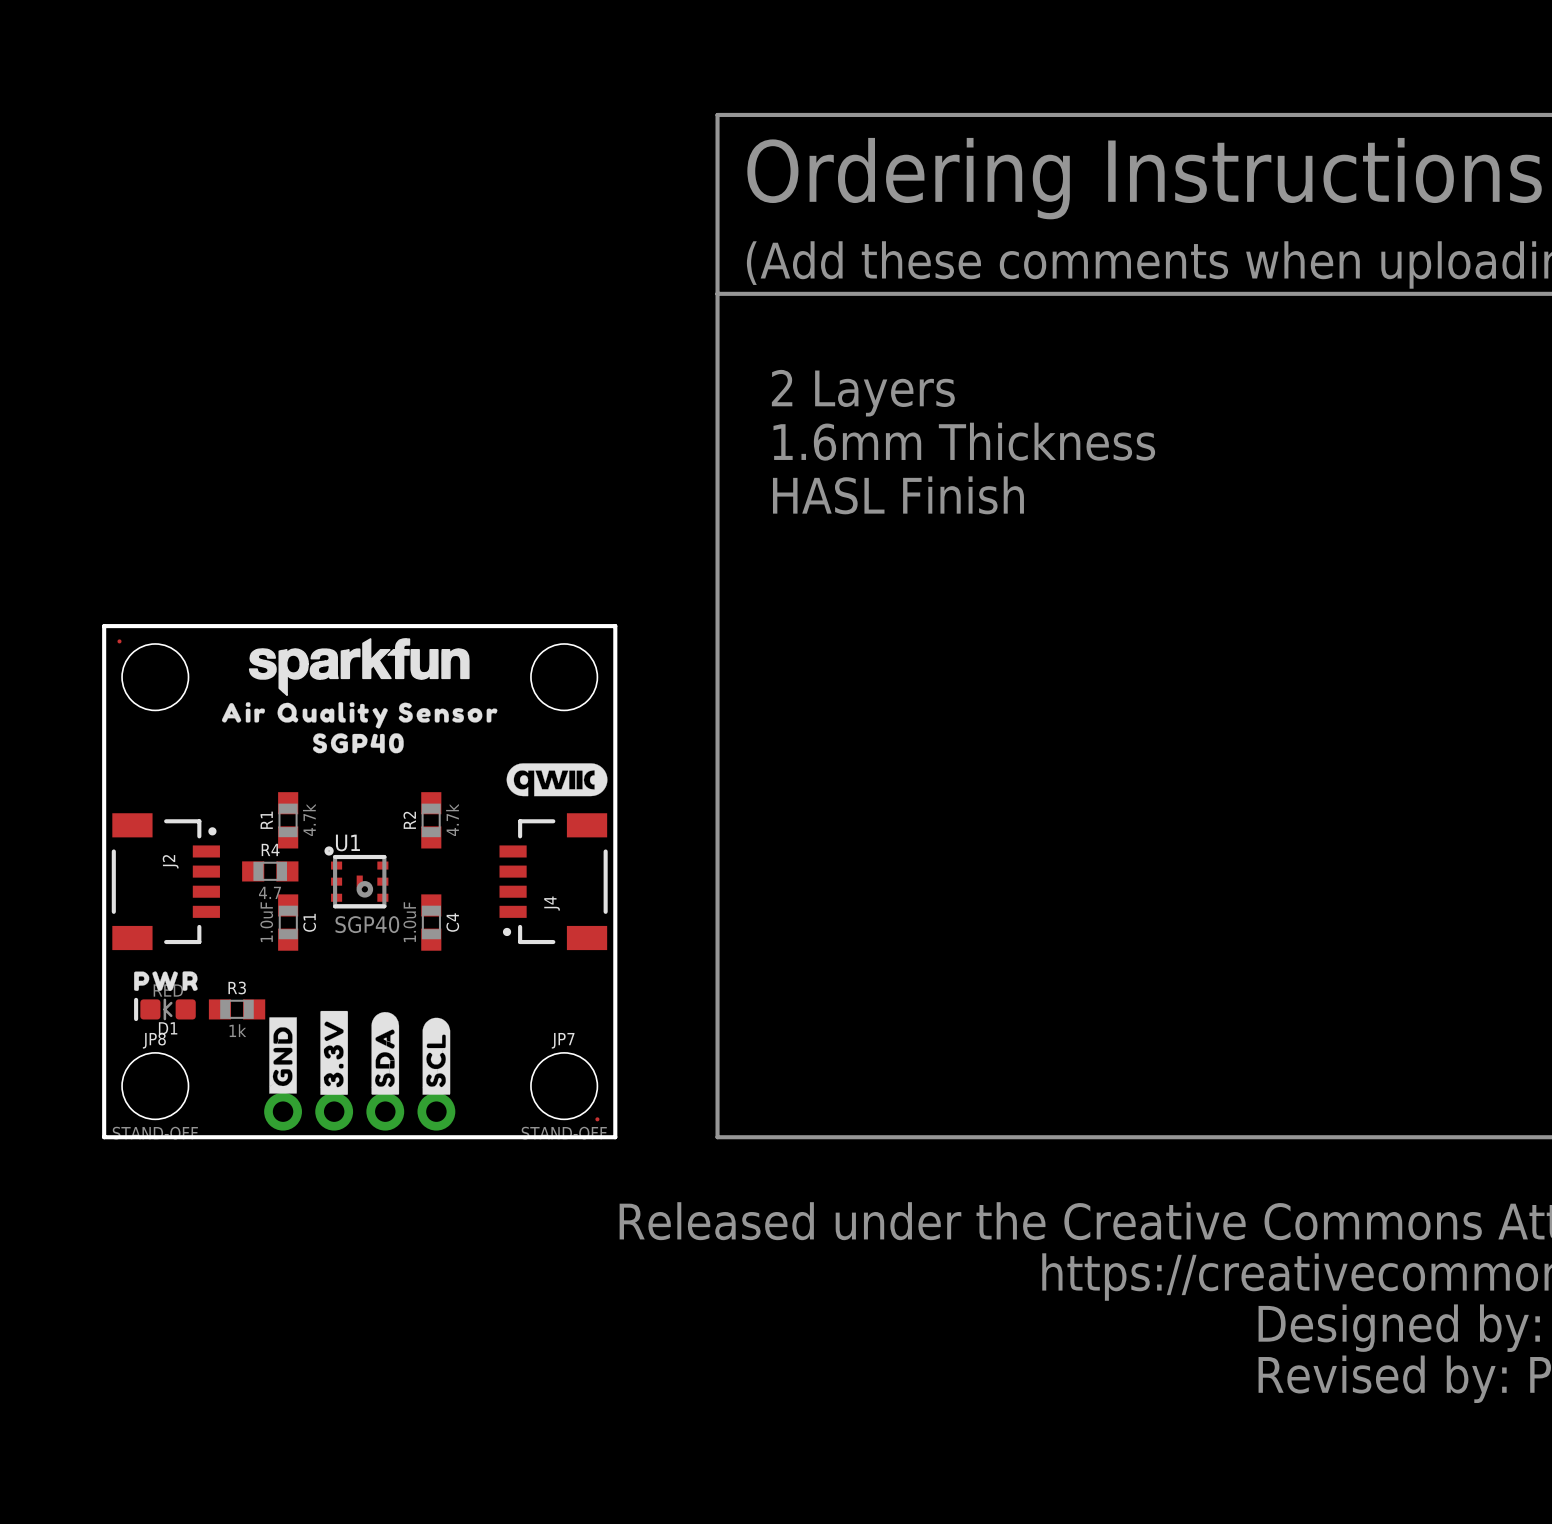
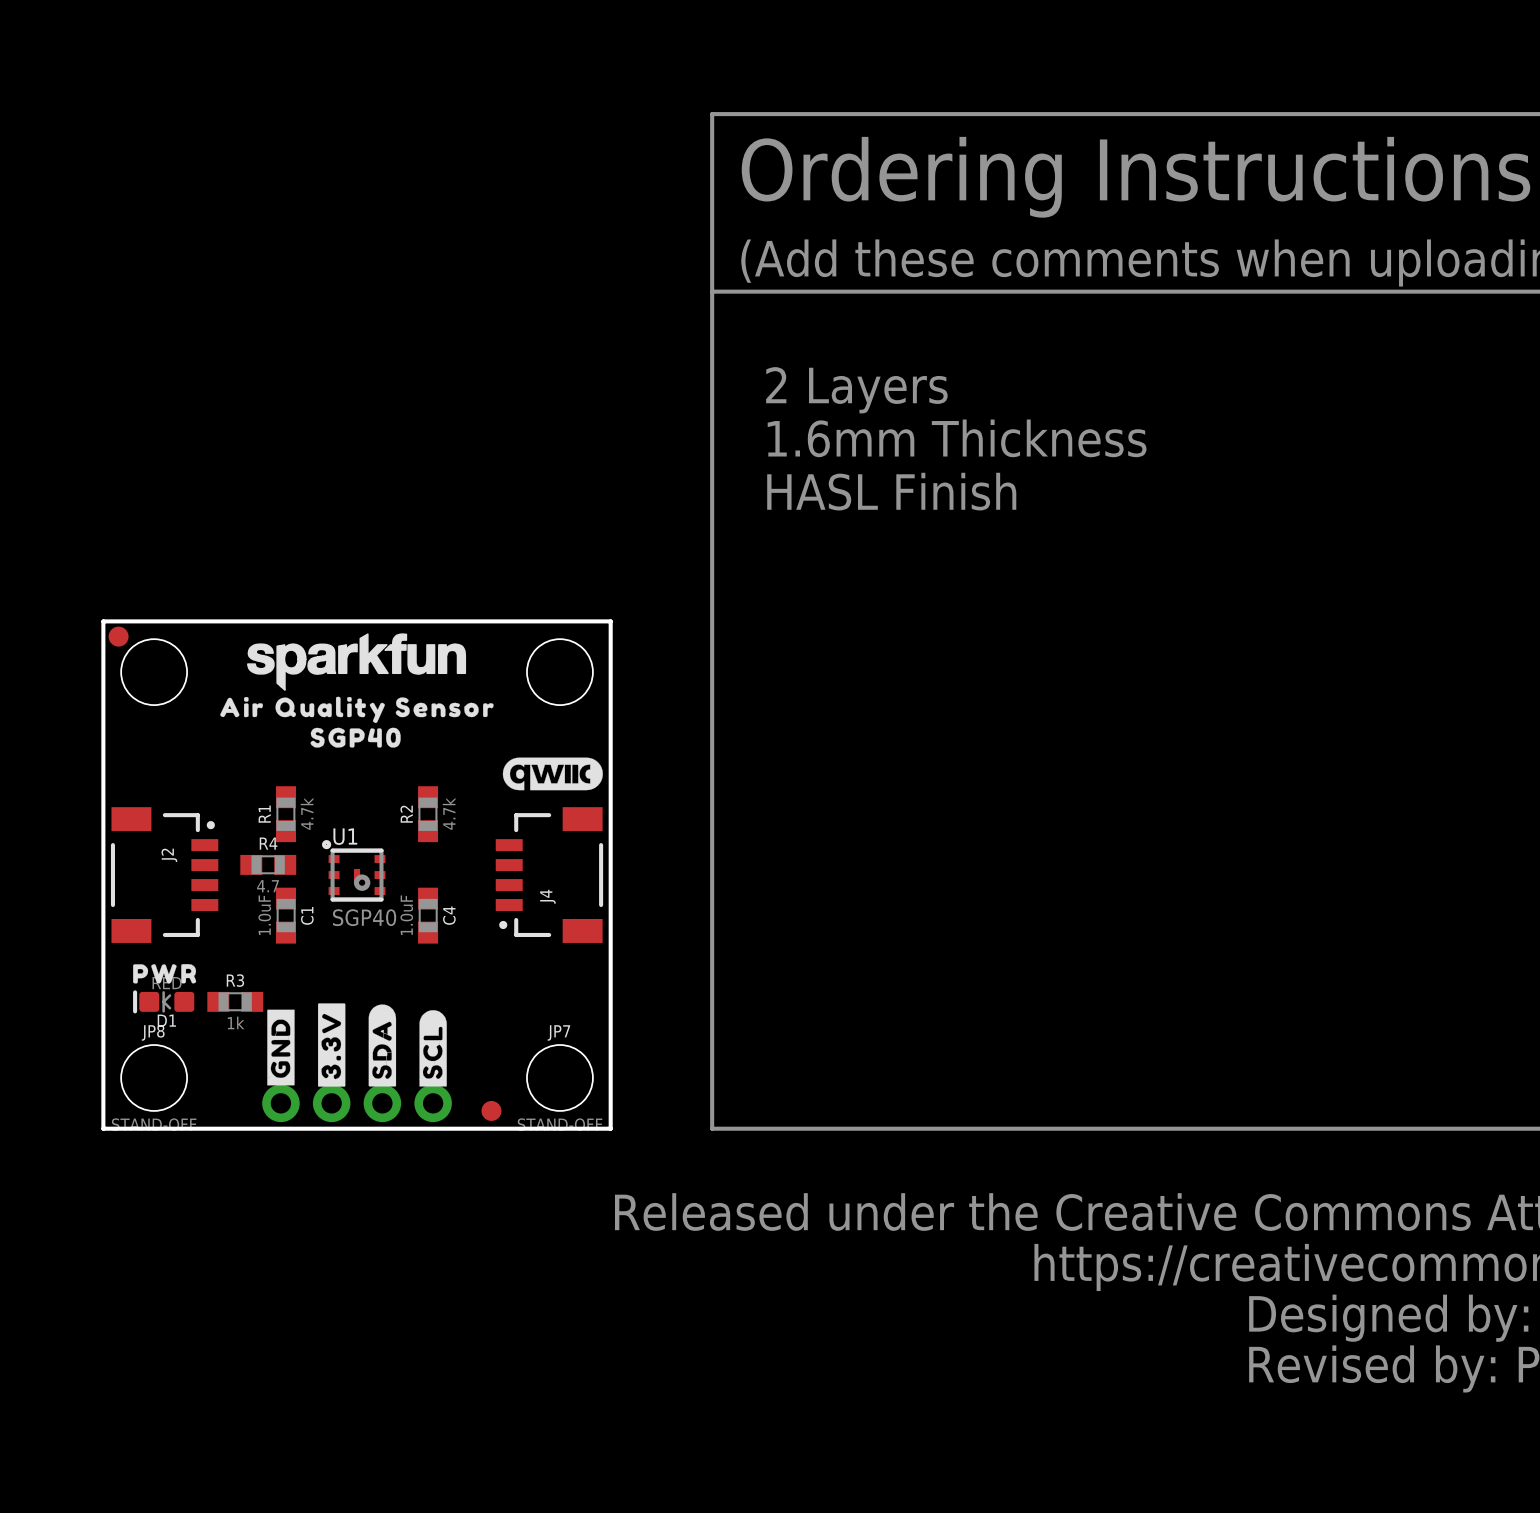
part footprint: [117, 639, 122, 644] -> [108, 626, 129, 647]
part: none -> (491, 1110)
part: (597, 1119) -> none

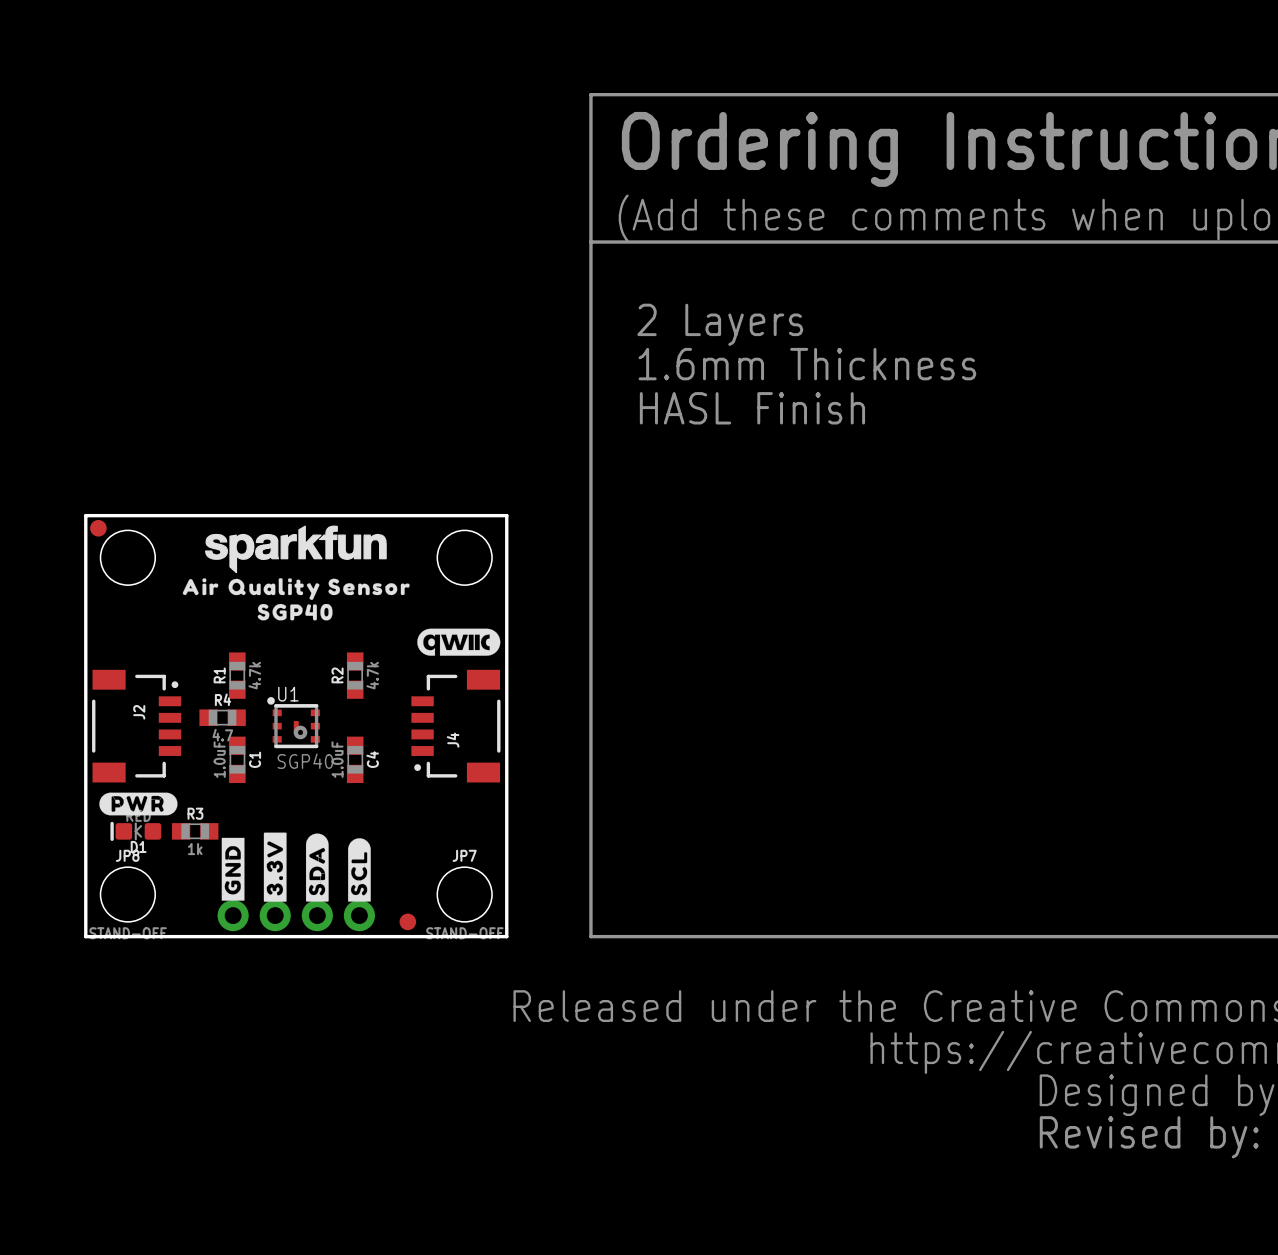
drawing shape: [133, 964, 197, 984] -> [99, 792, 178, 816]

